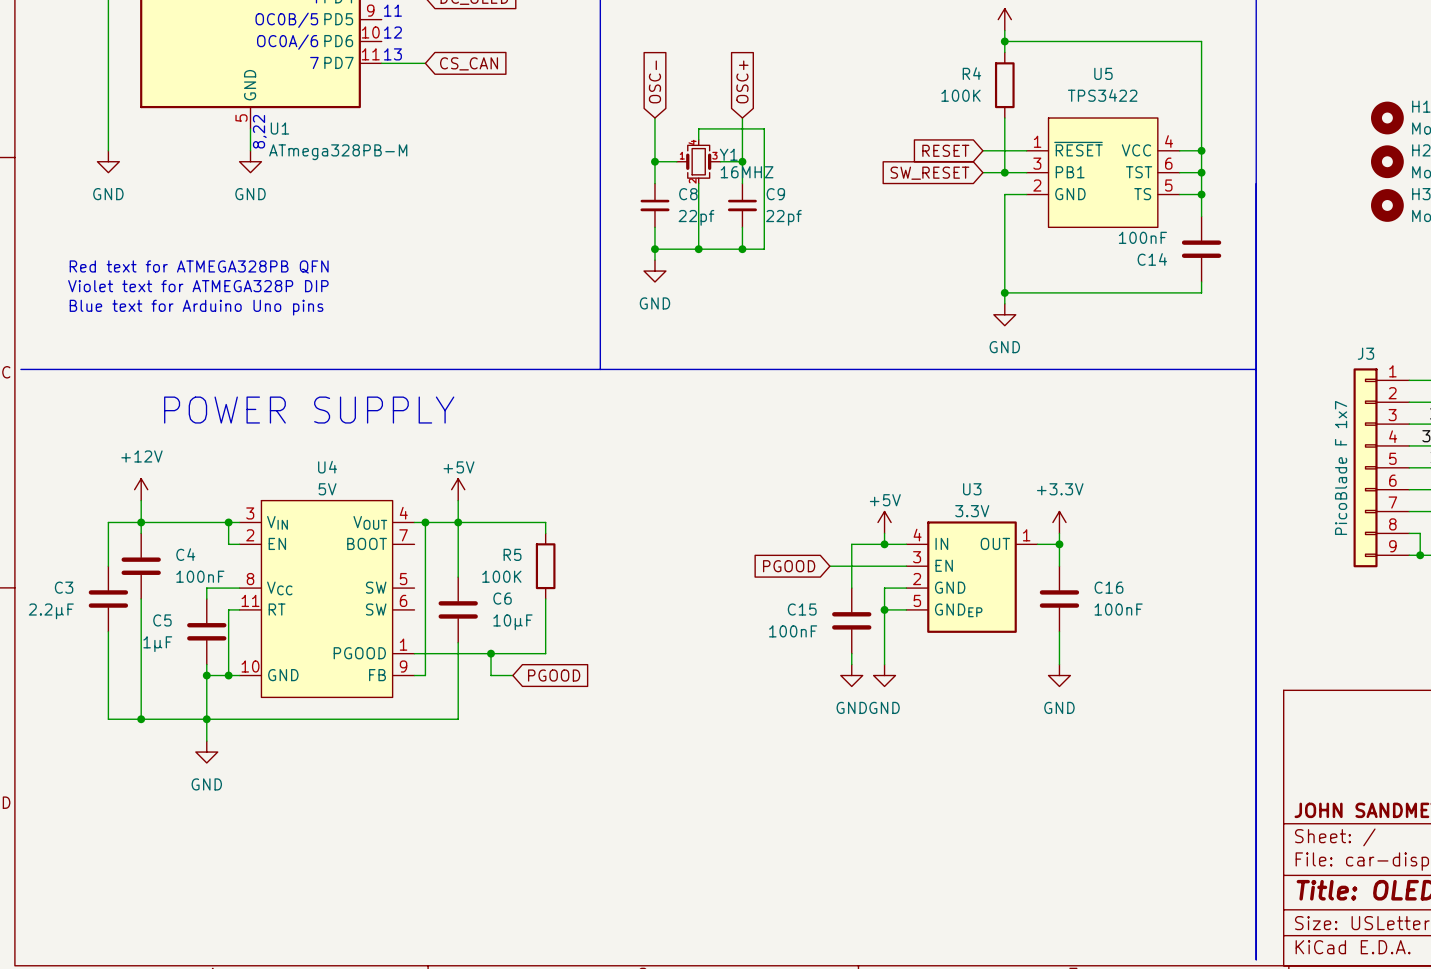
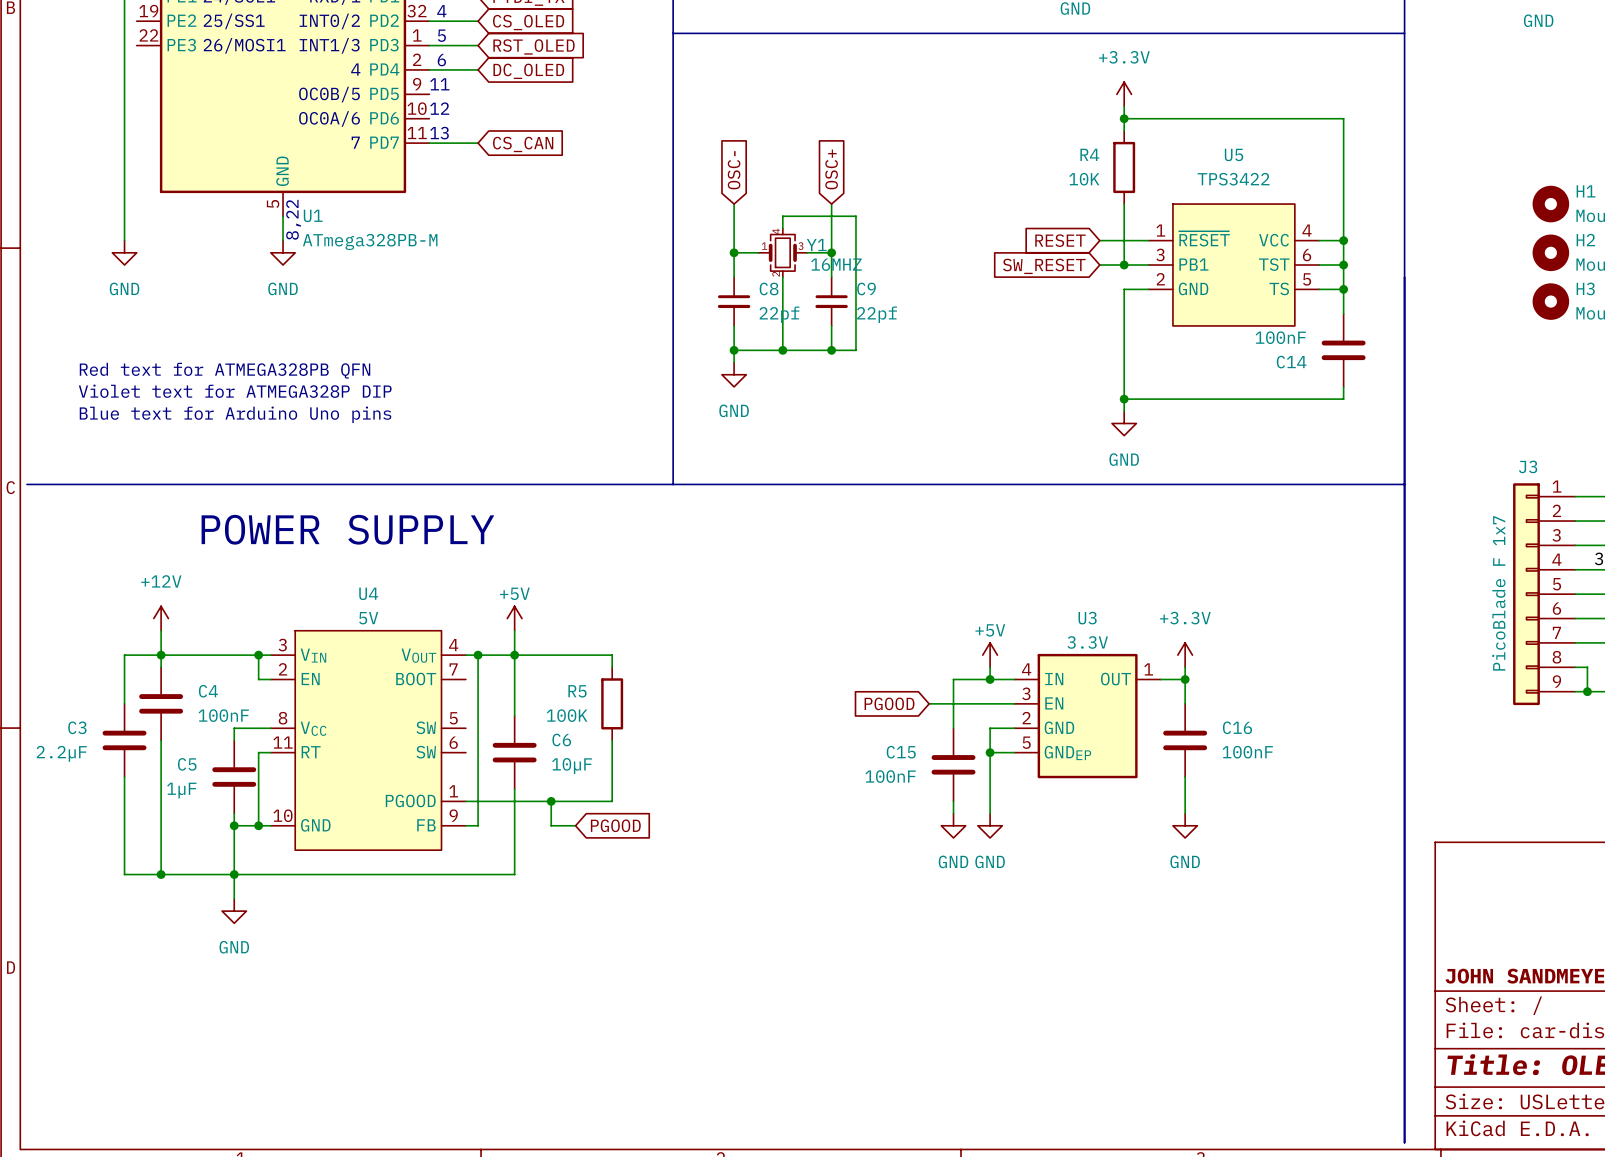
R4 value: 100K (960, 95) -> 10K (1084, 179)

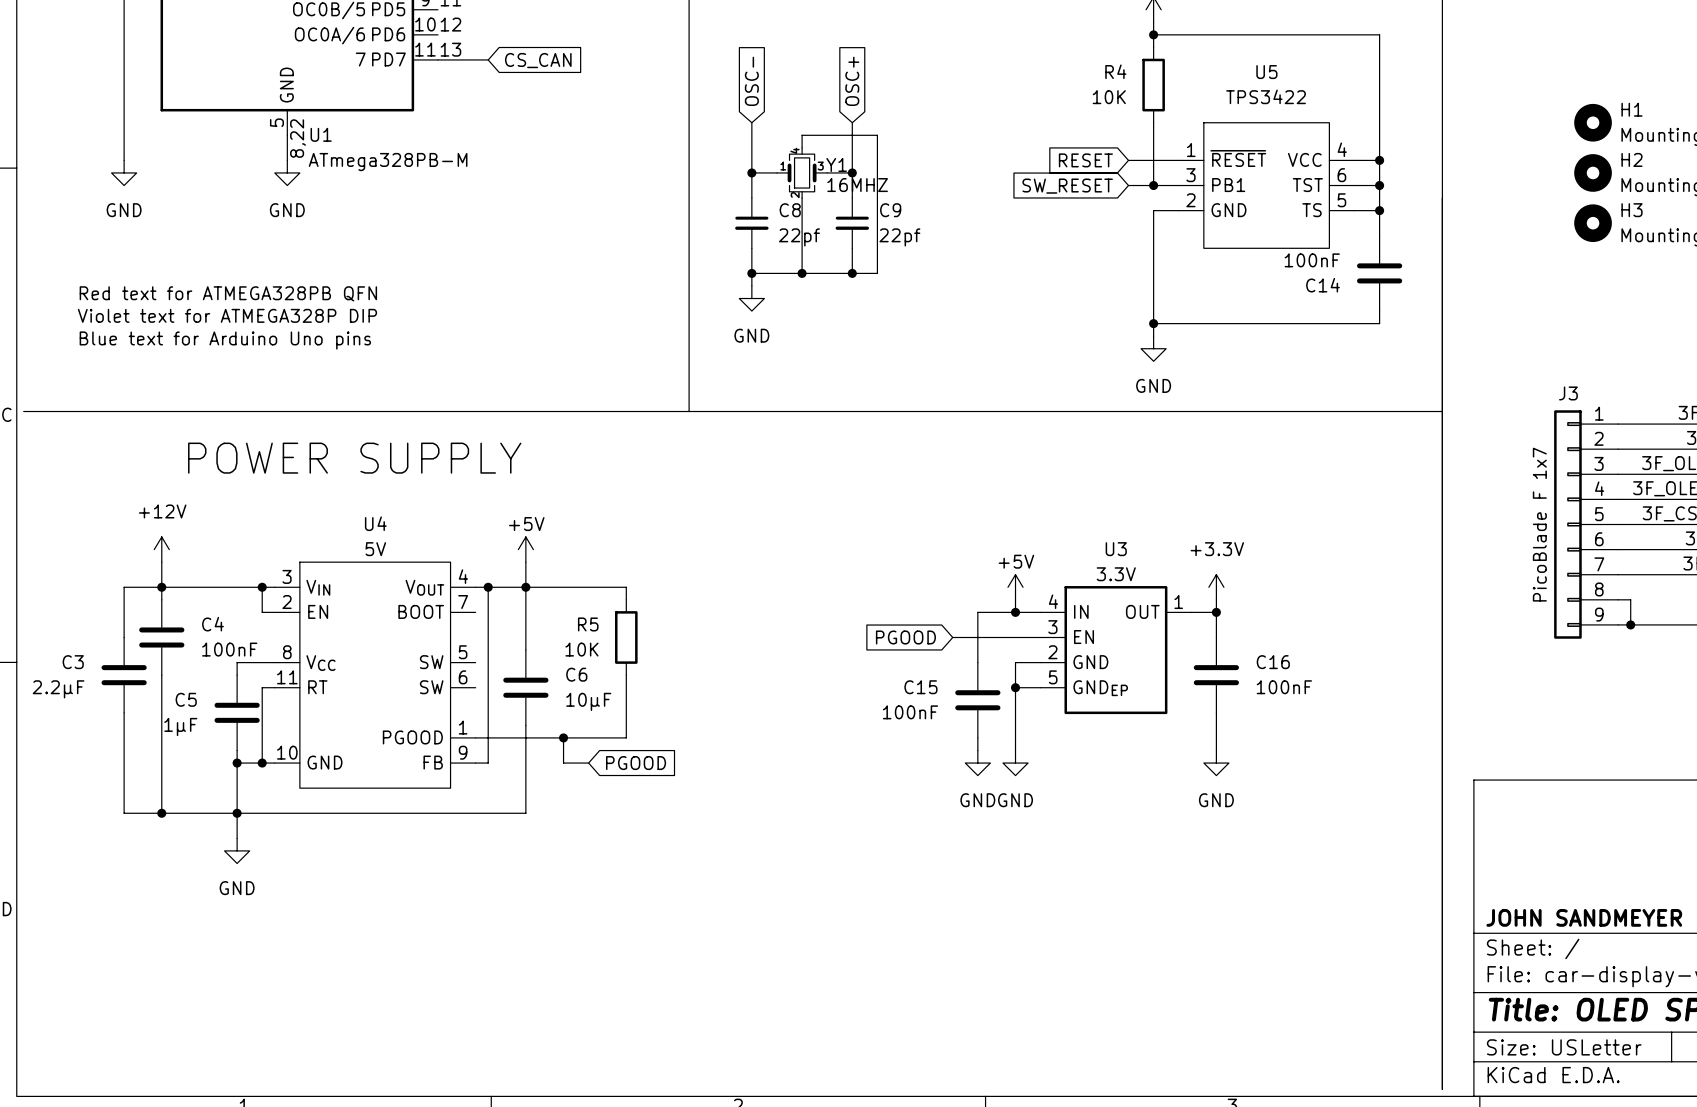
R5 value: 100K (567, 715) -> 10K (581, 649)

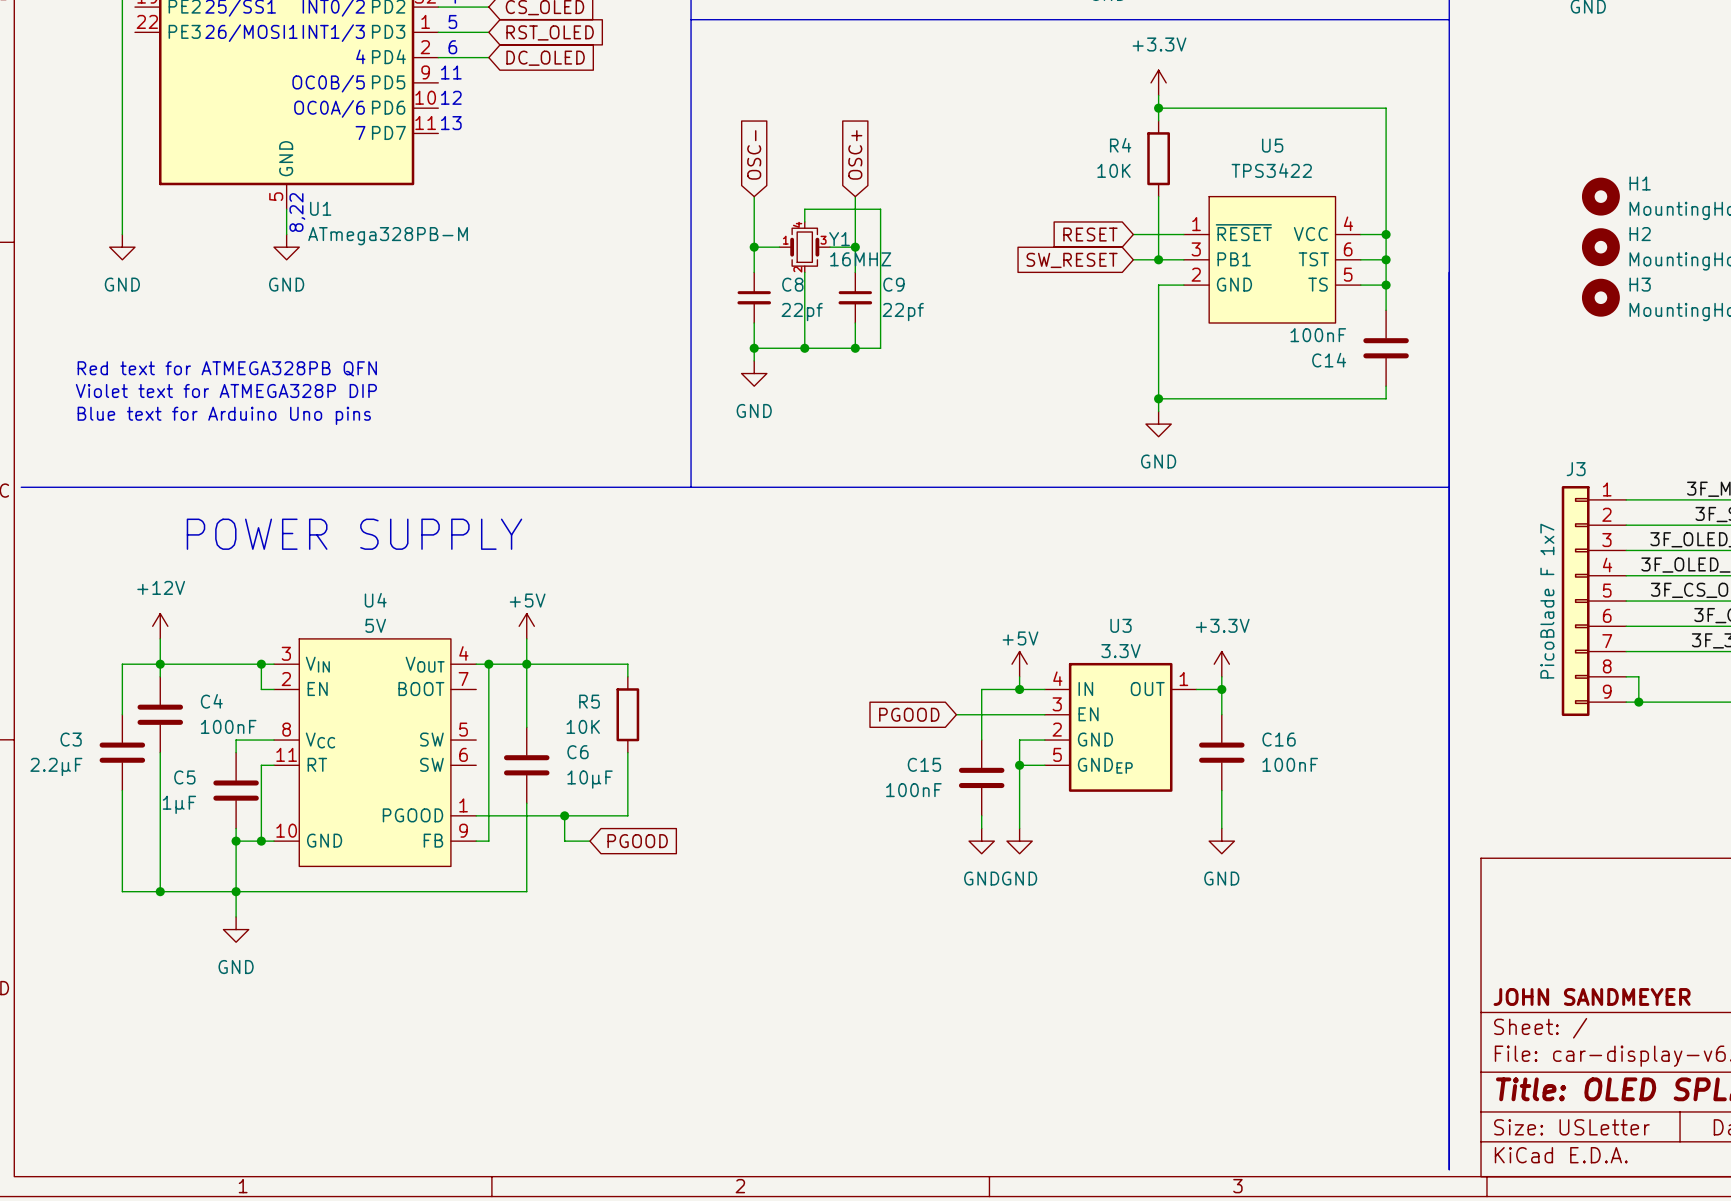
wire: (437, 59) (488, 59) -> none
global label: CS_CAN (538, 60) -> none

